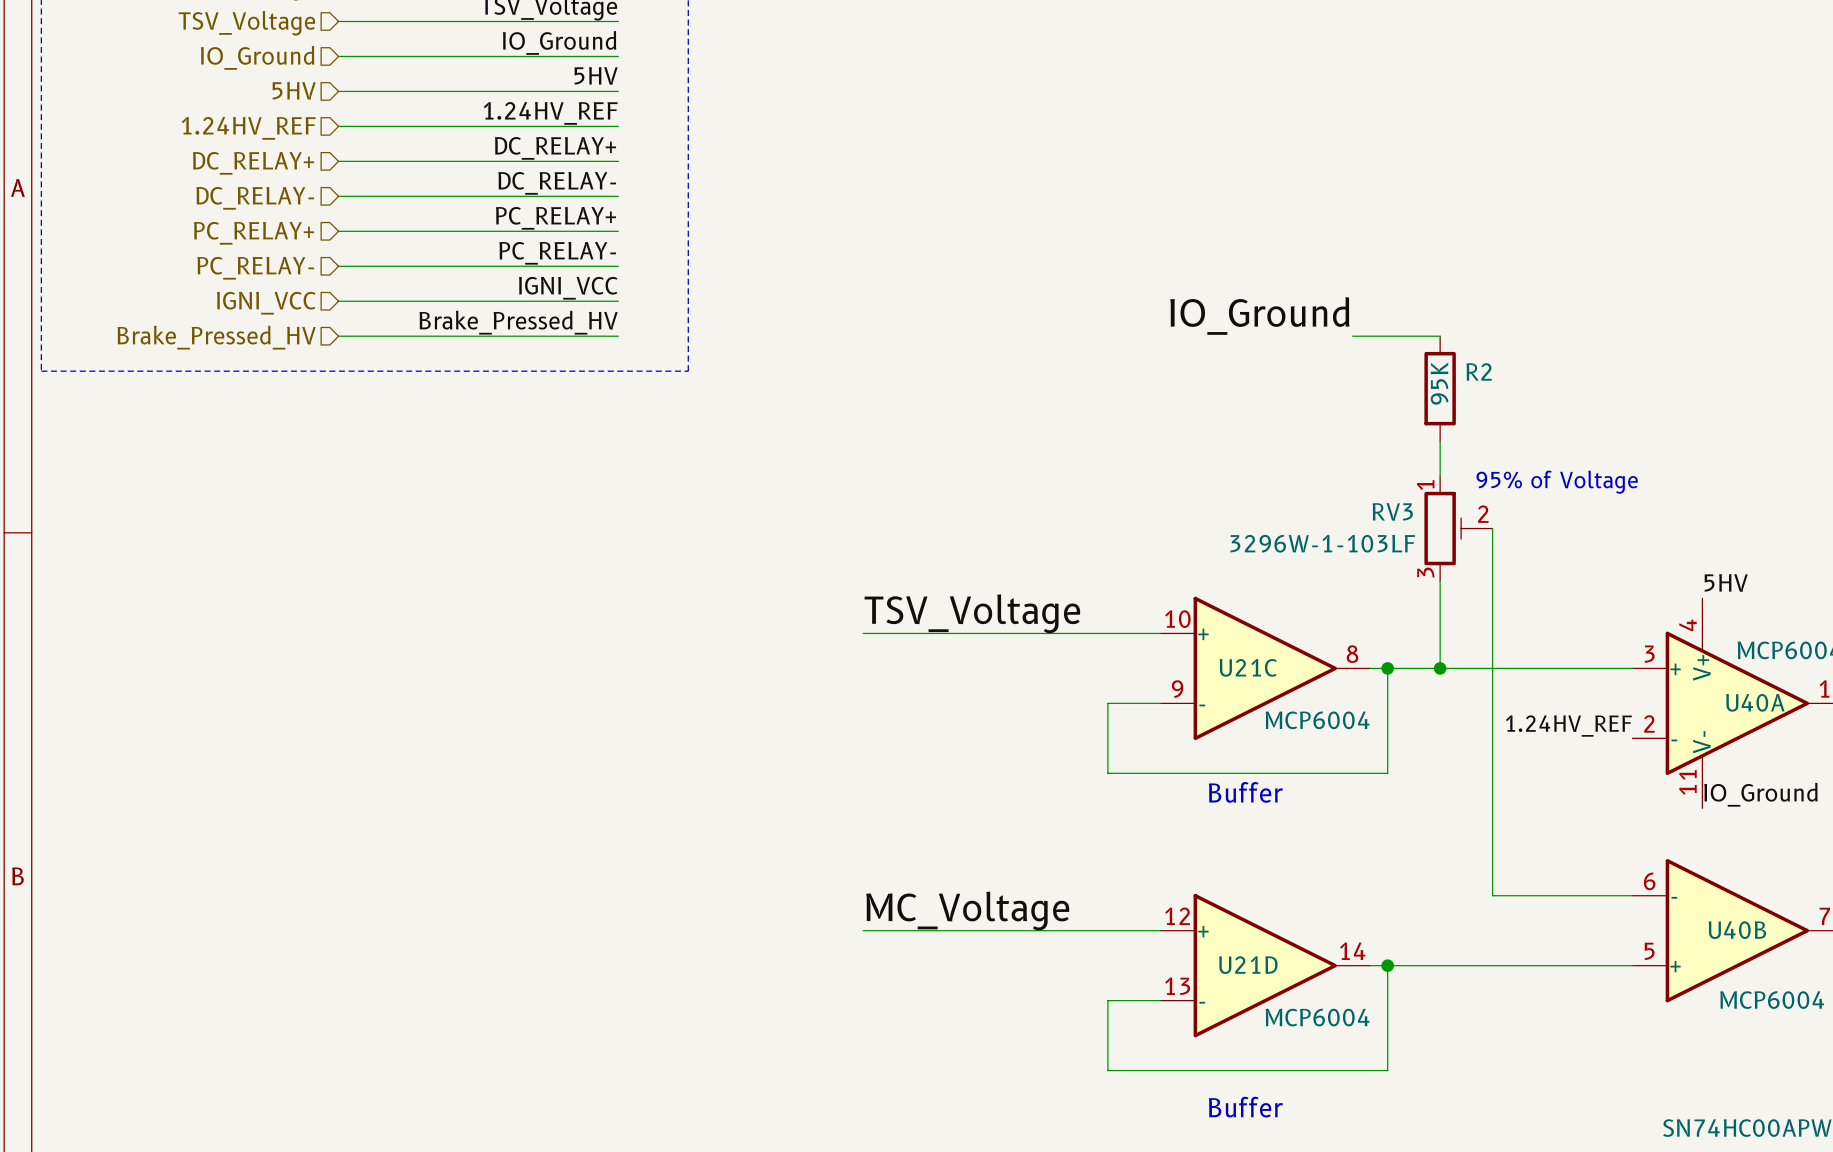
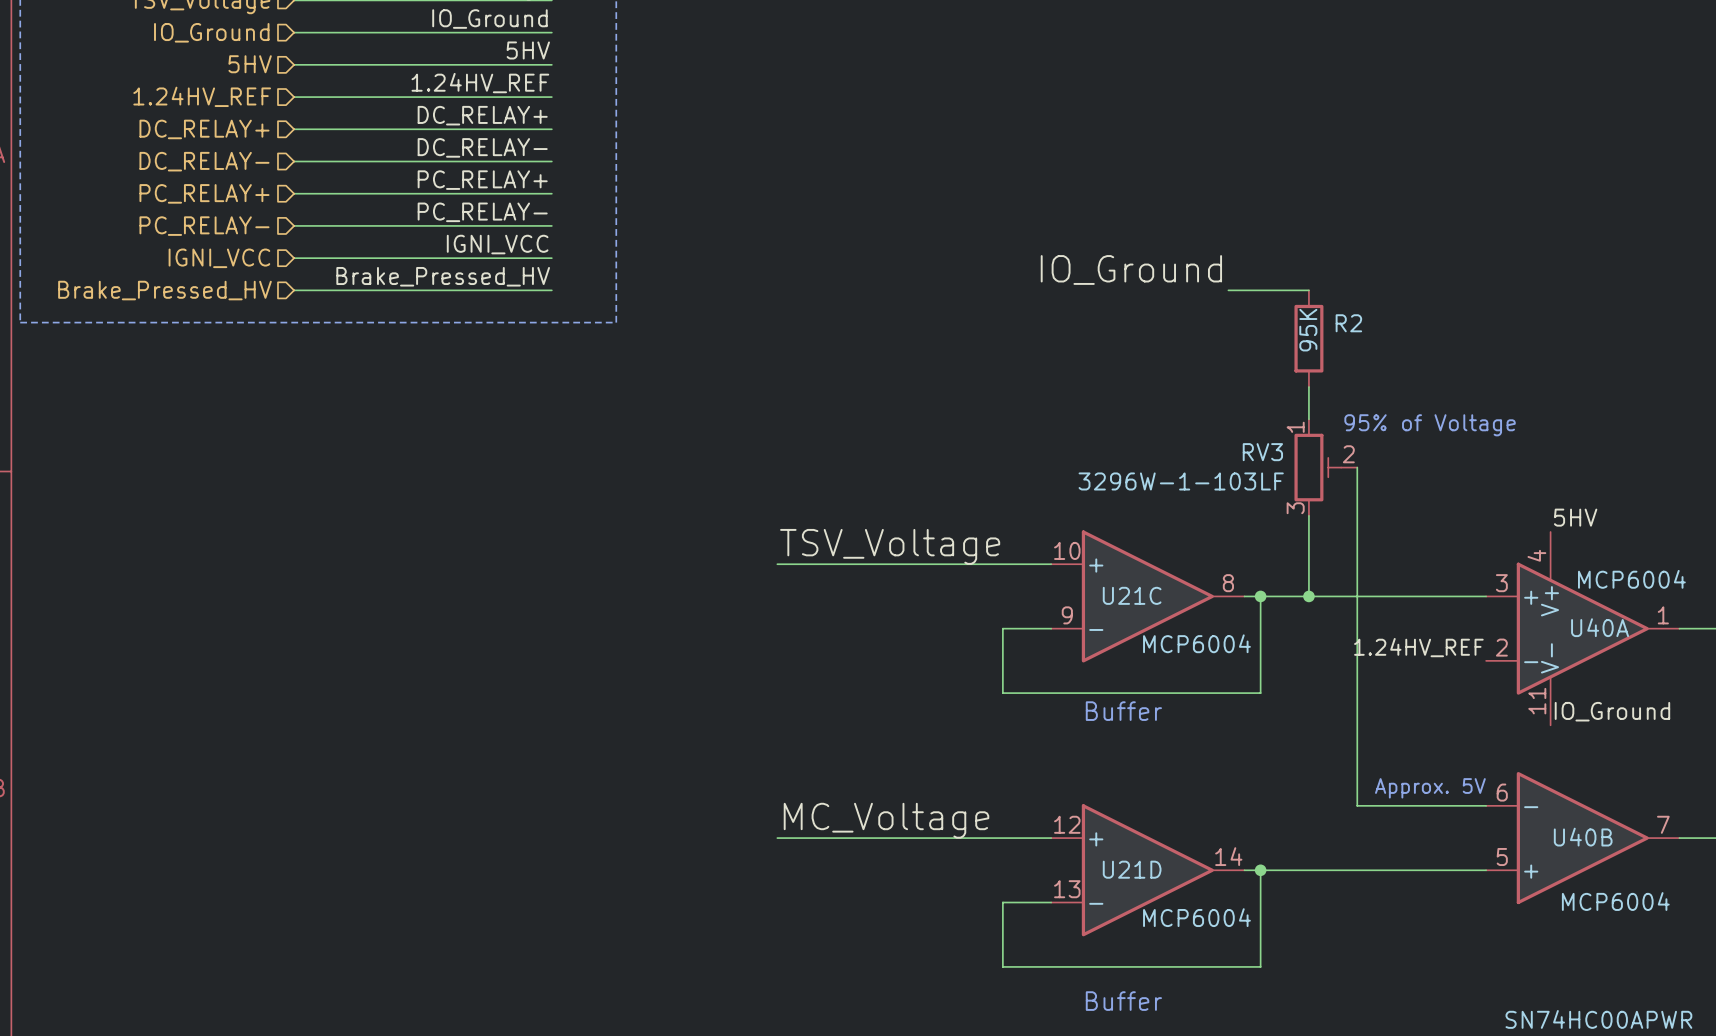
text: none -> Approx. 5V (1430, 788)

